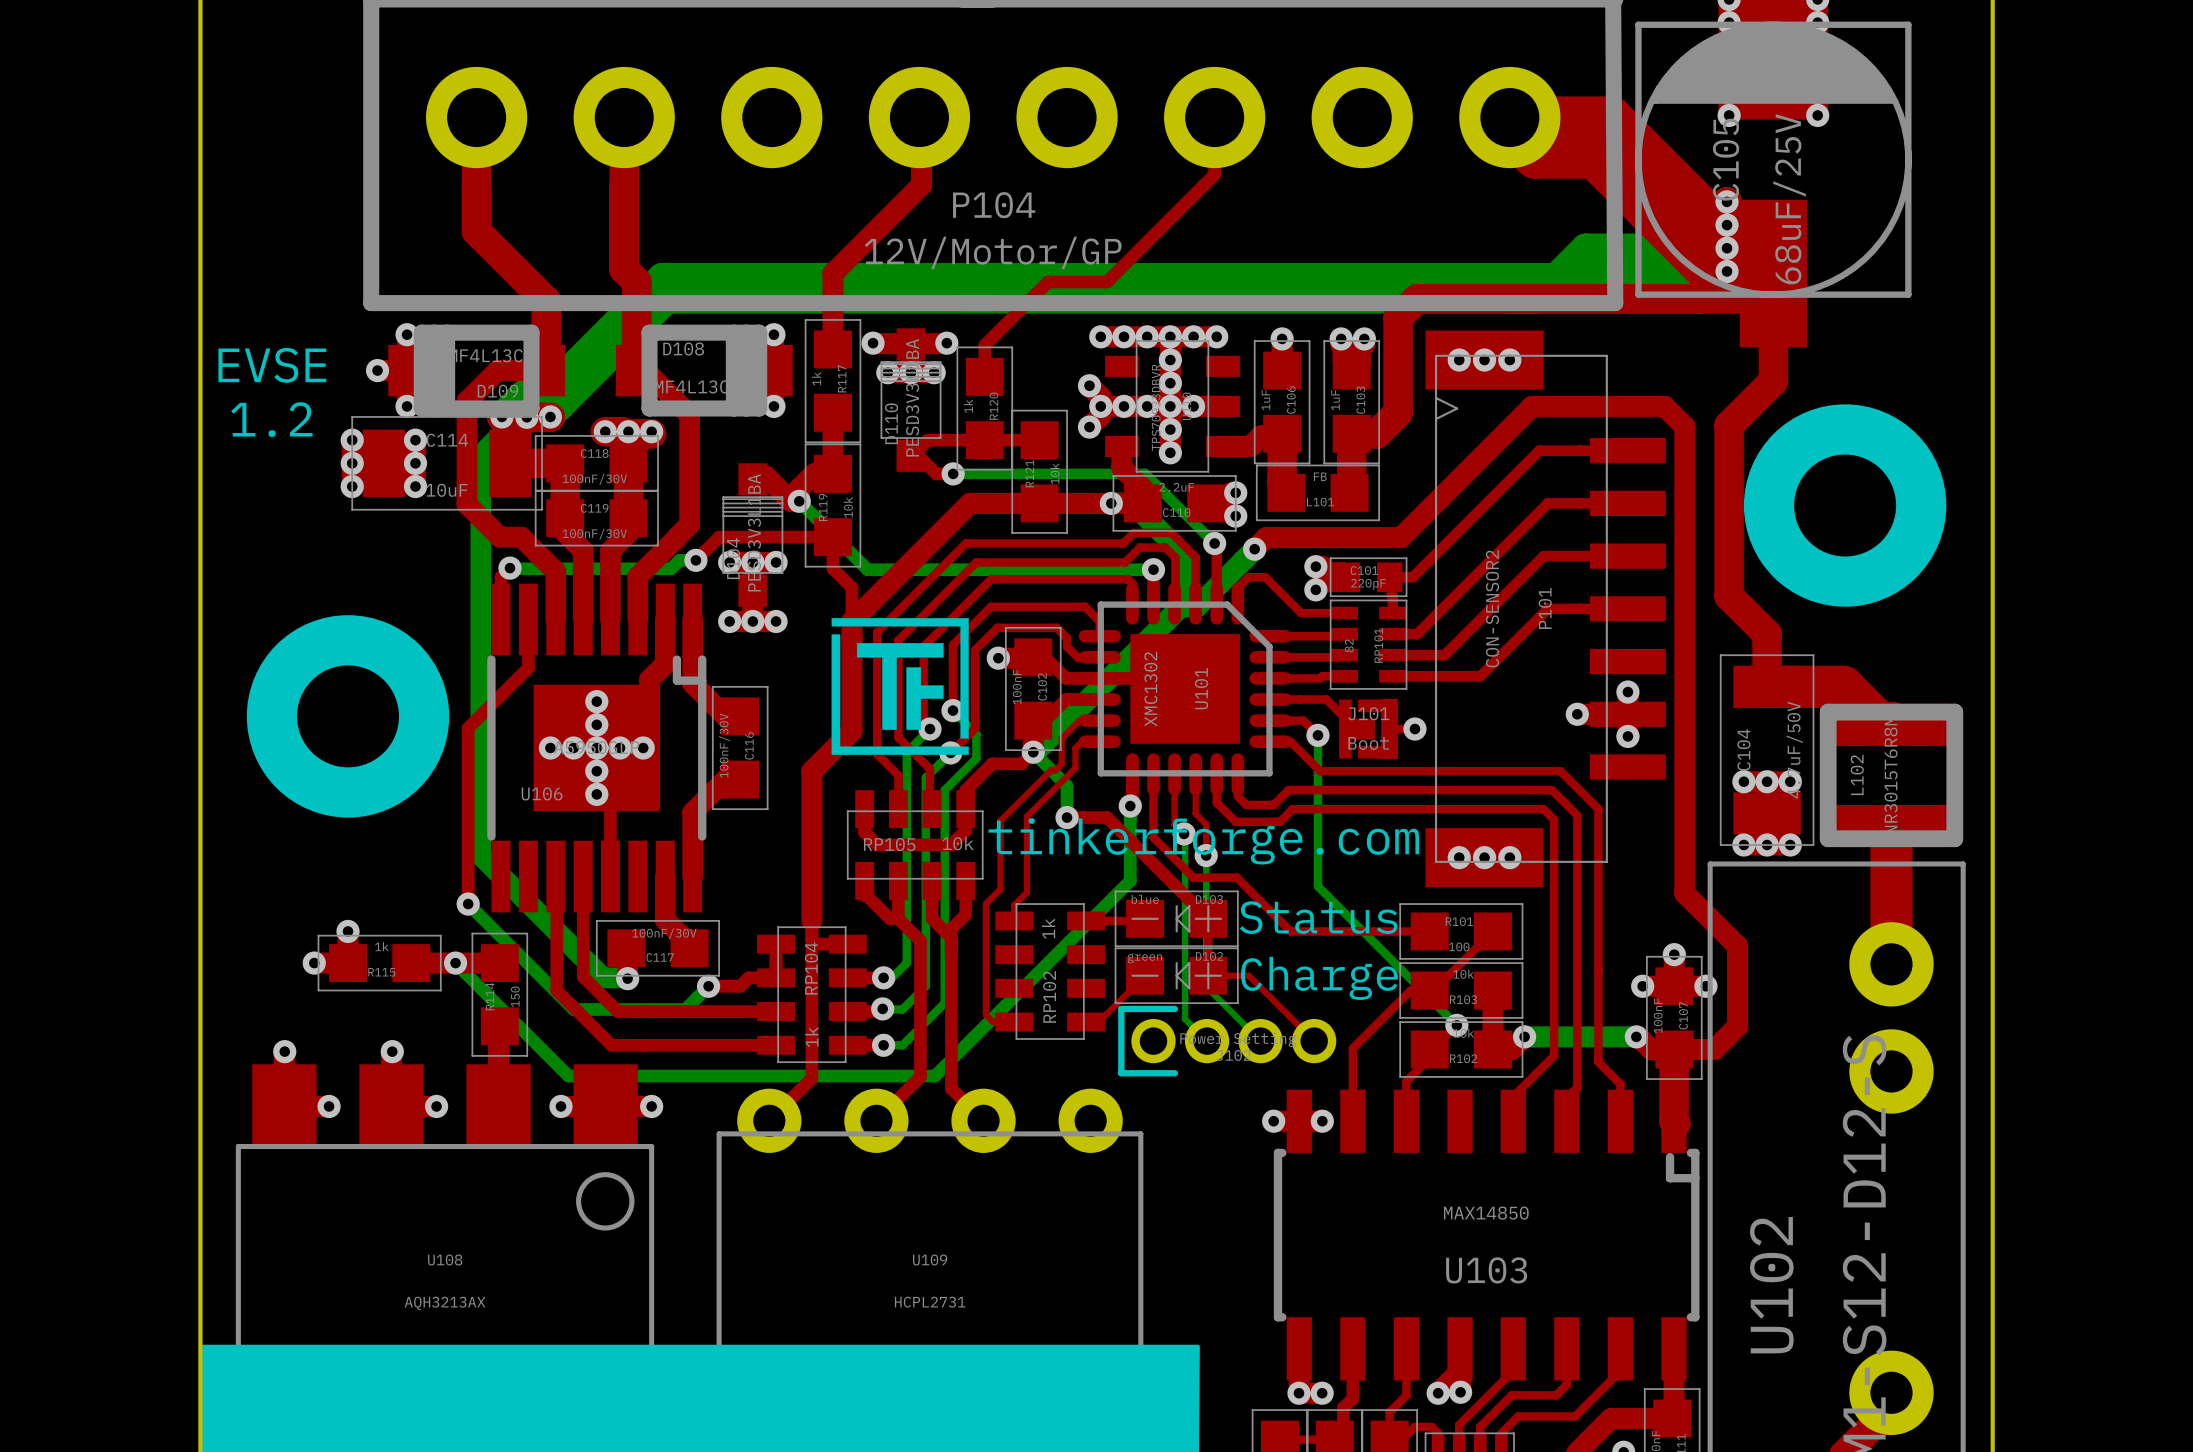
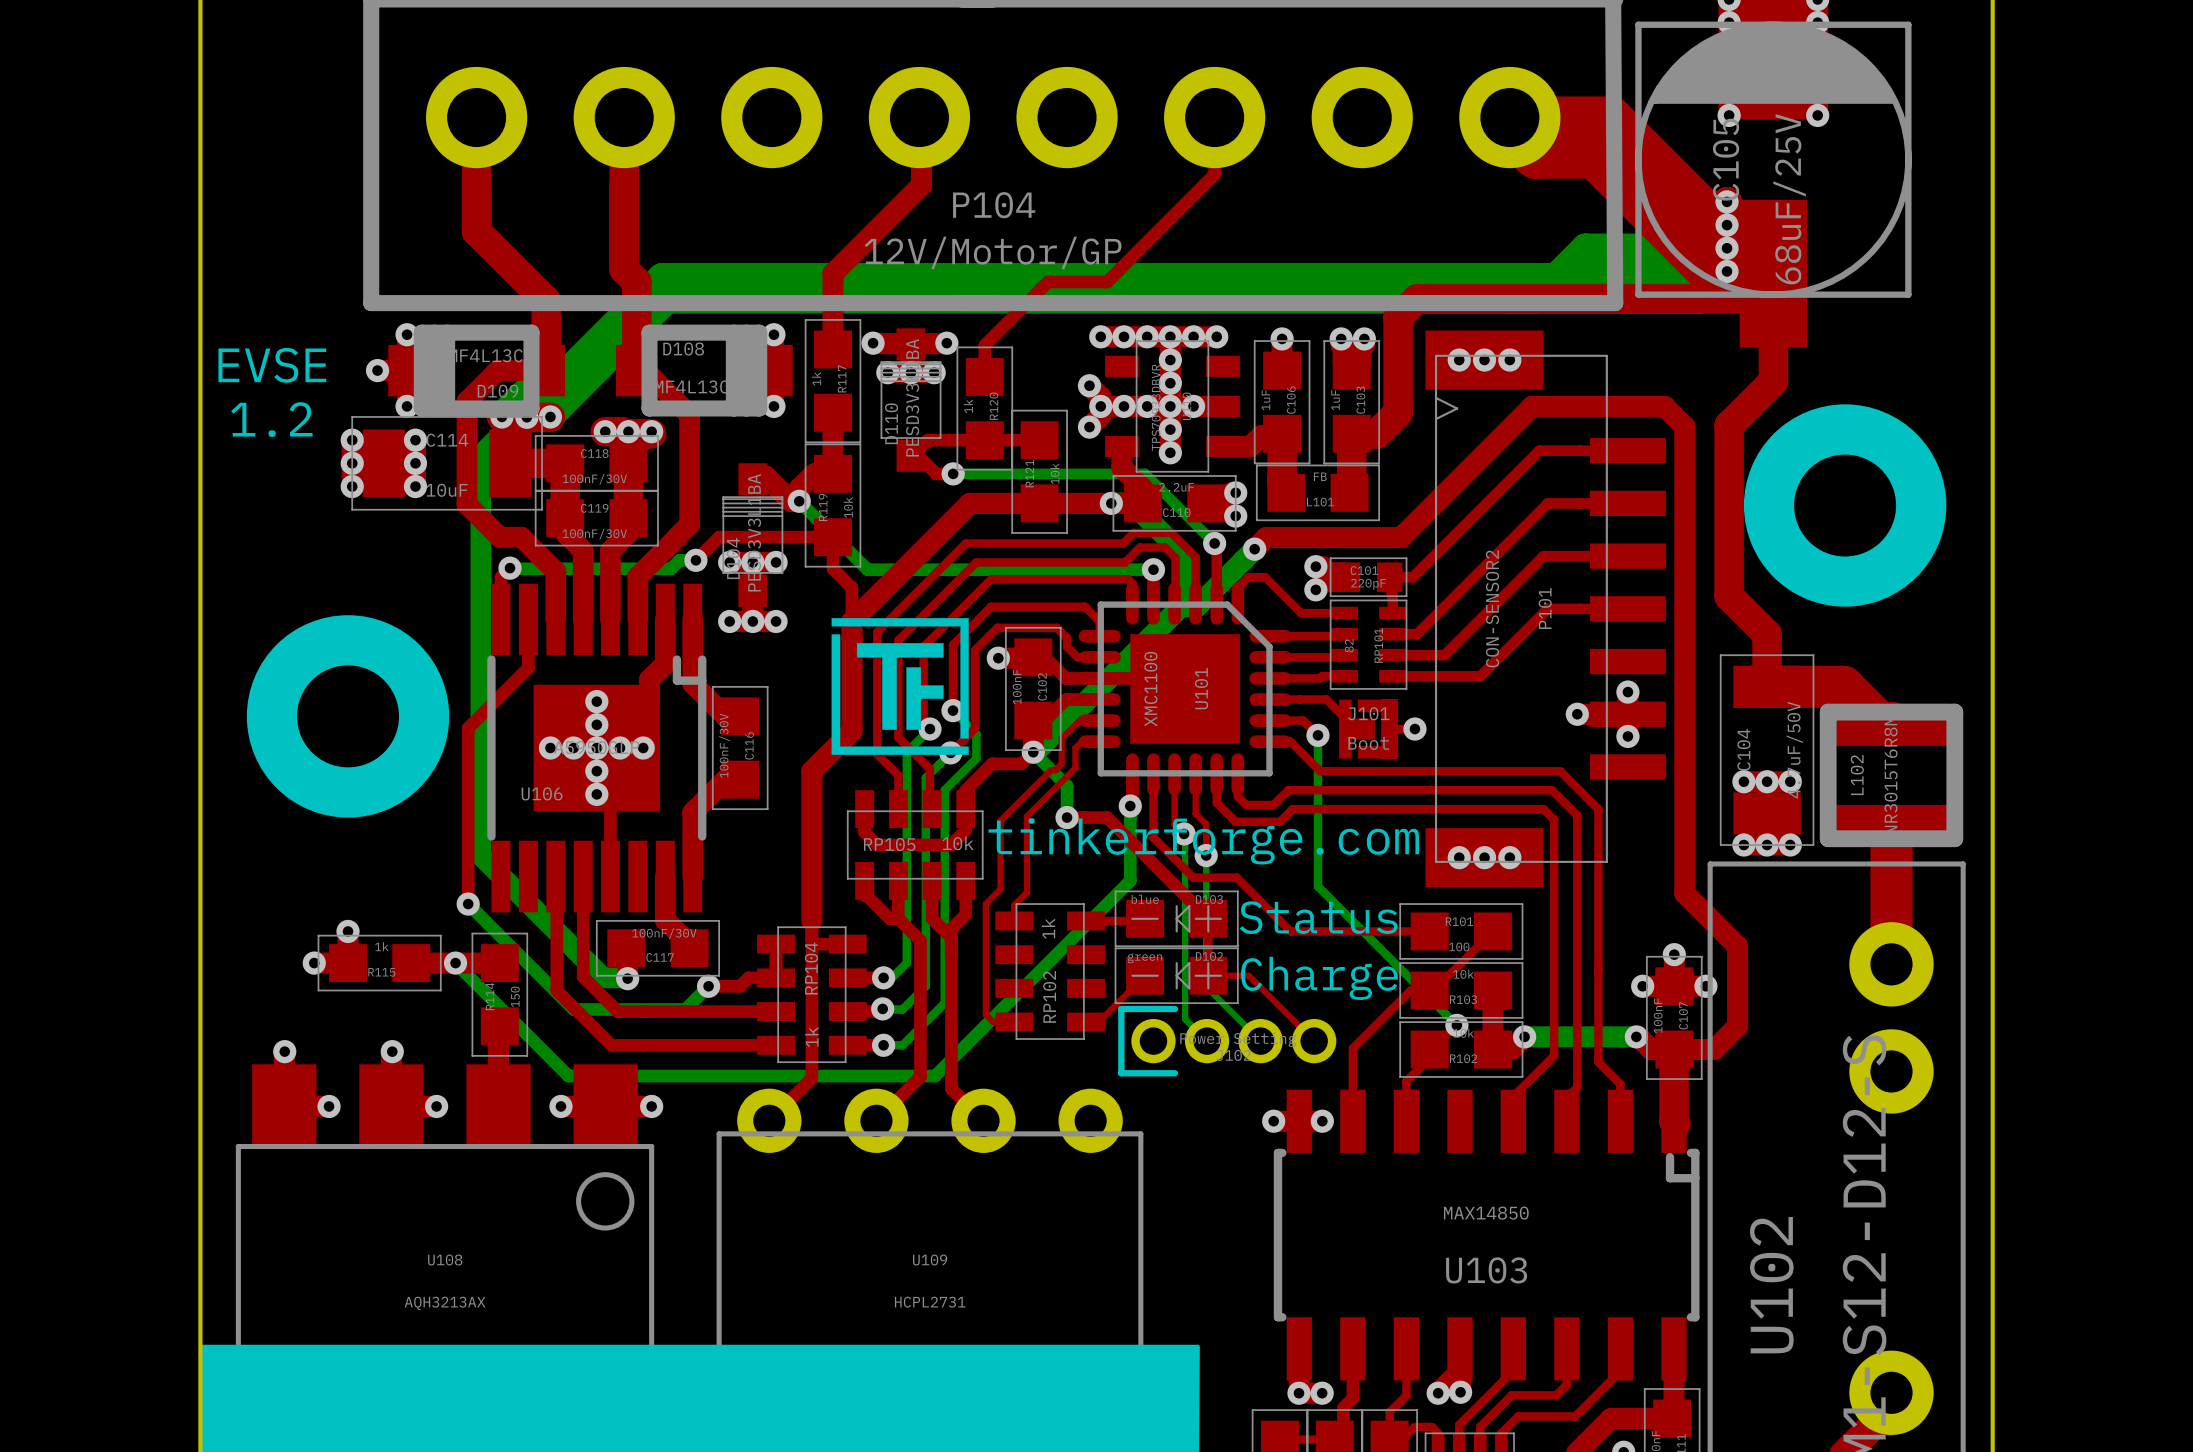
U101 value: XMC1302 (1150, 689) -> XMC1100 (1150, 689)

